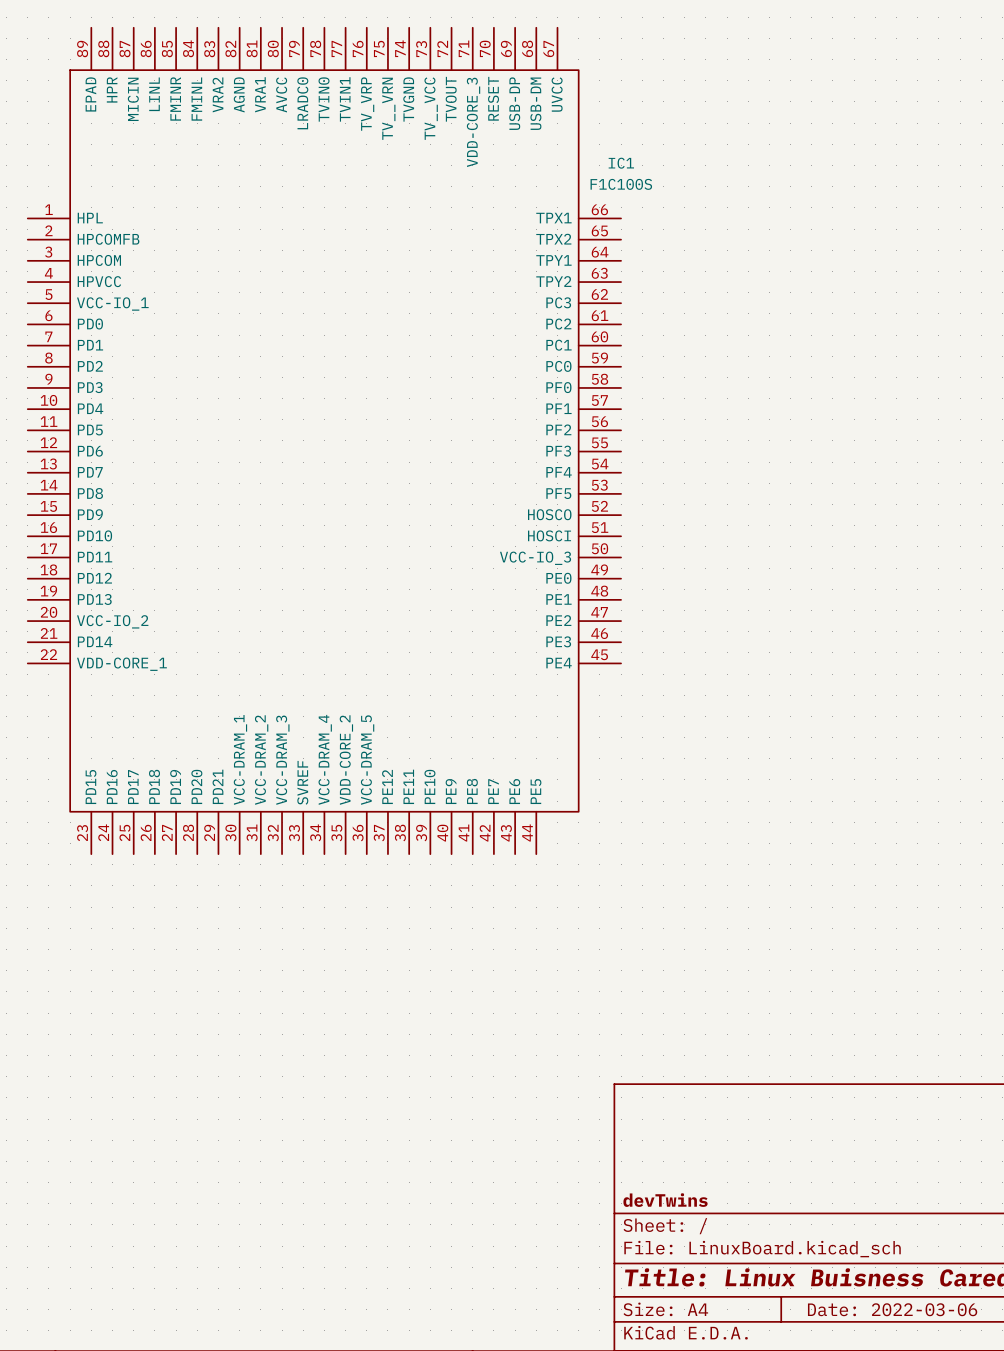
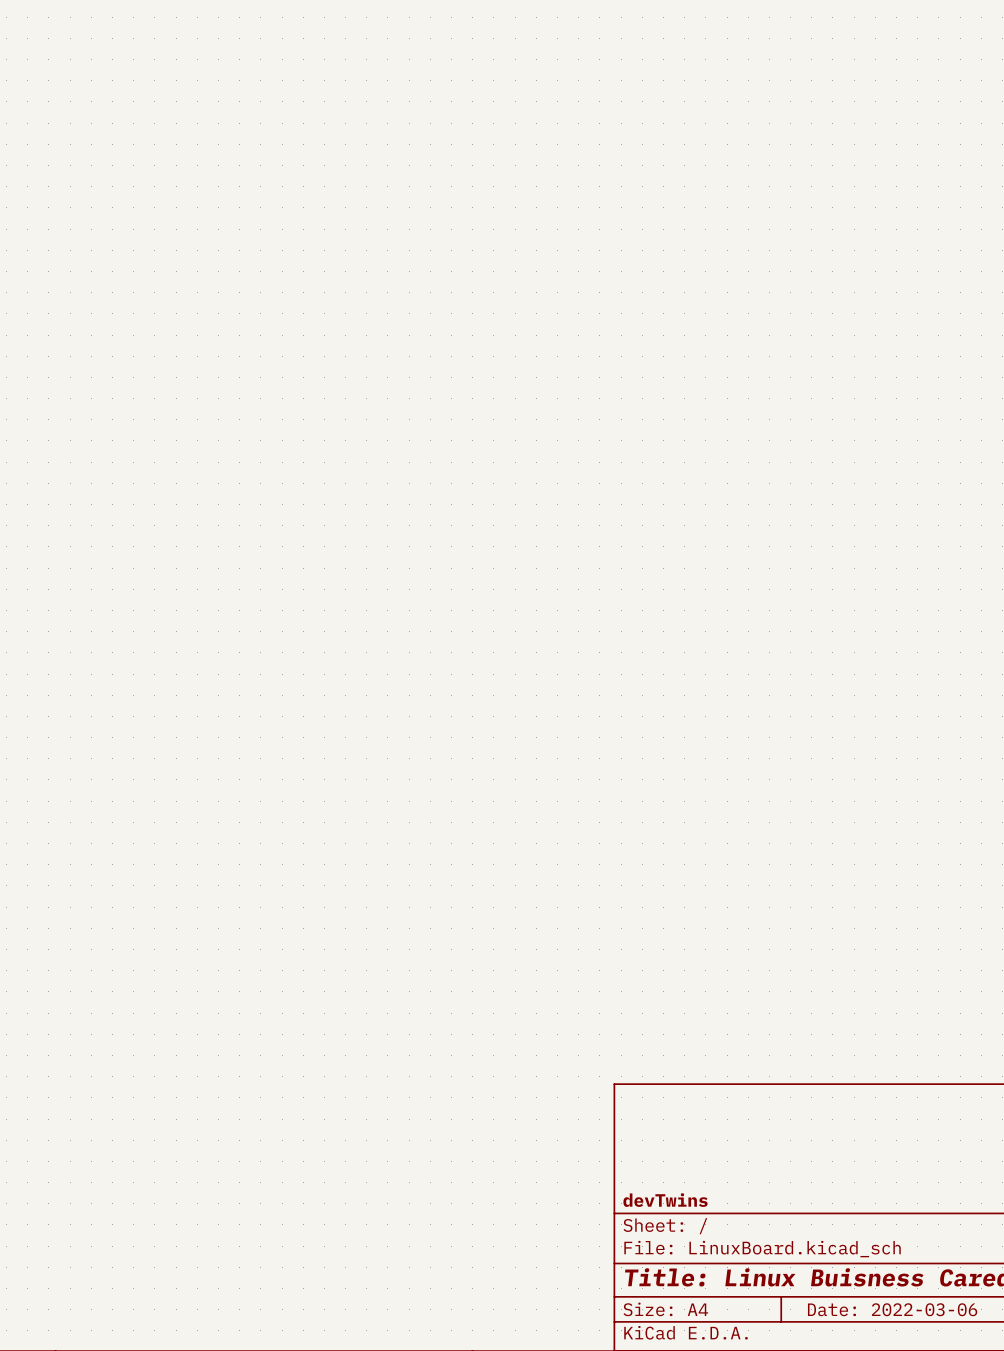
IC1: F1C100S (324, 440) -> none

